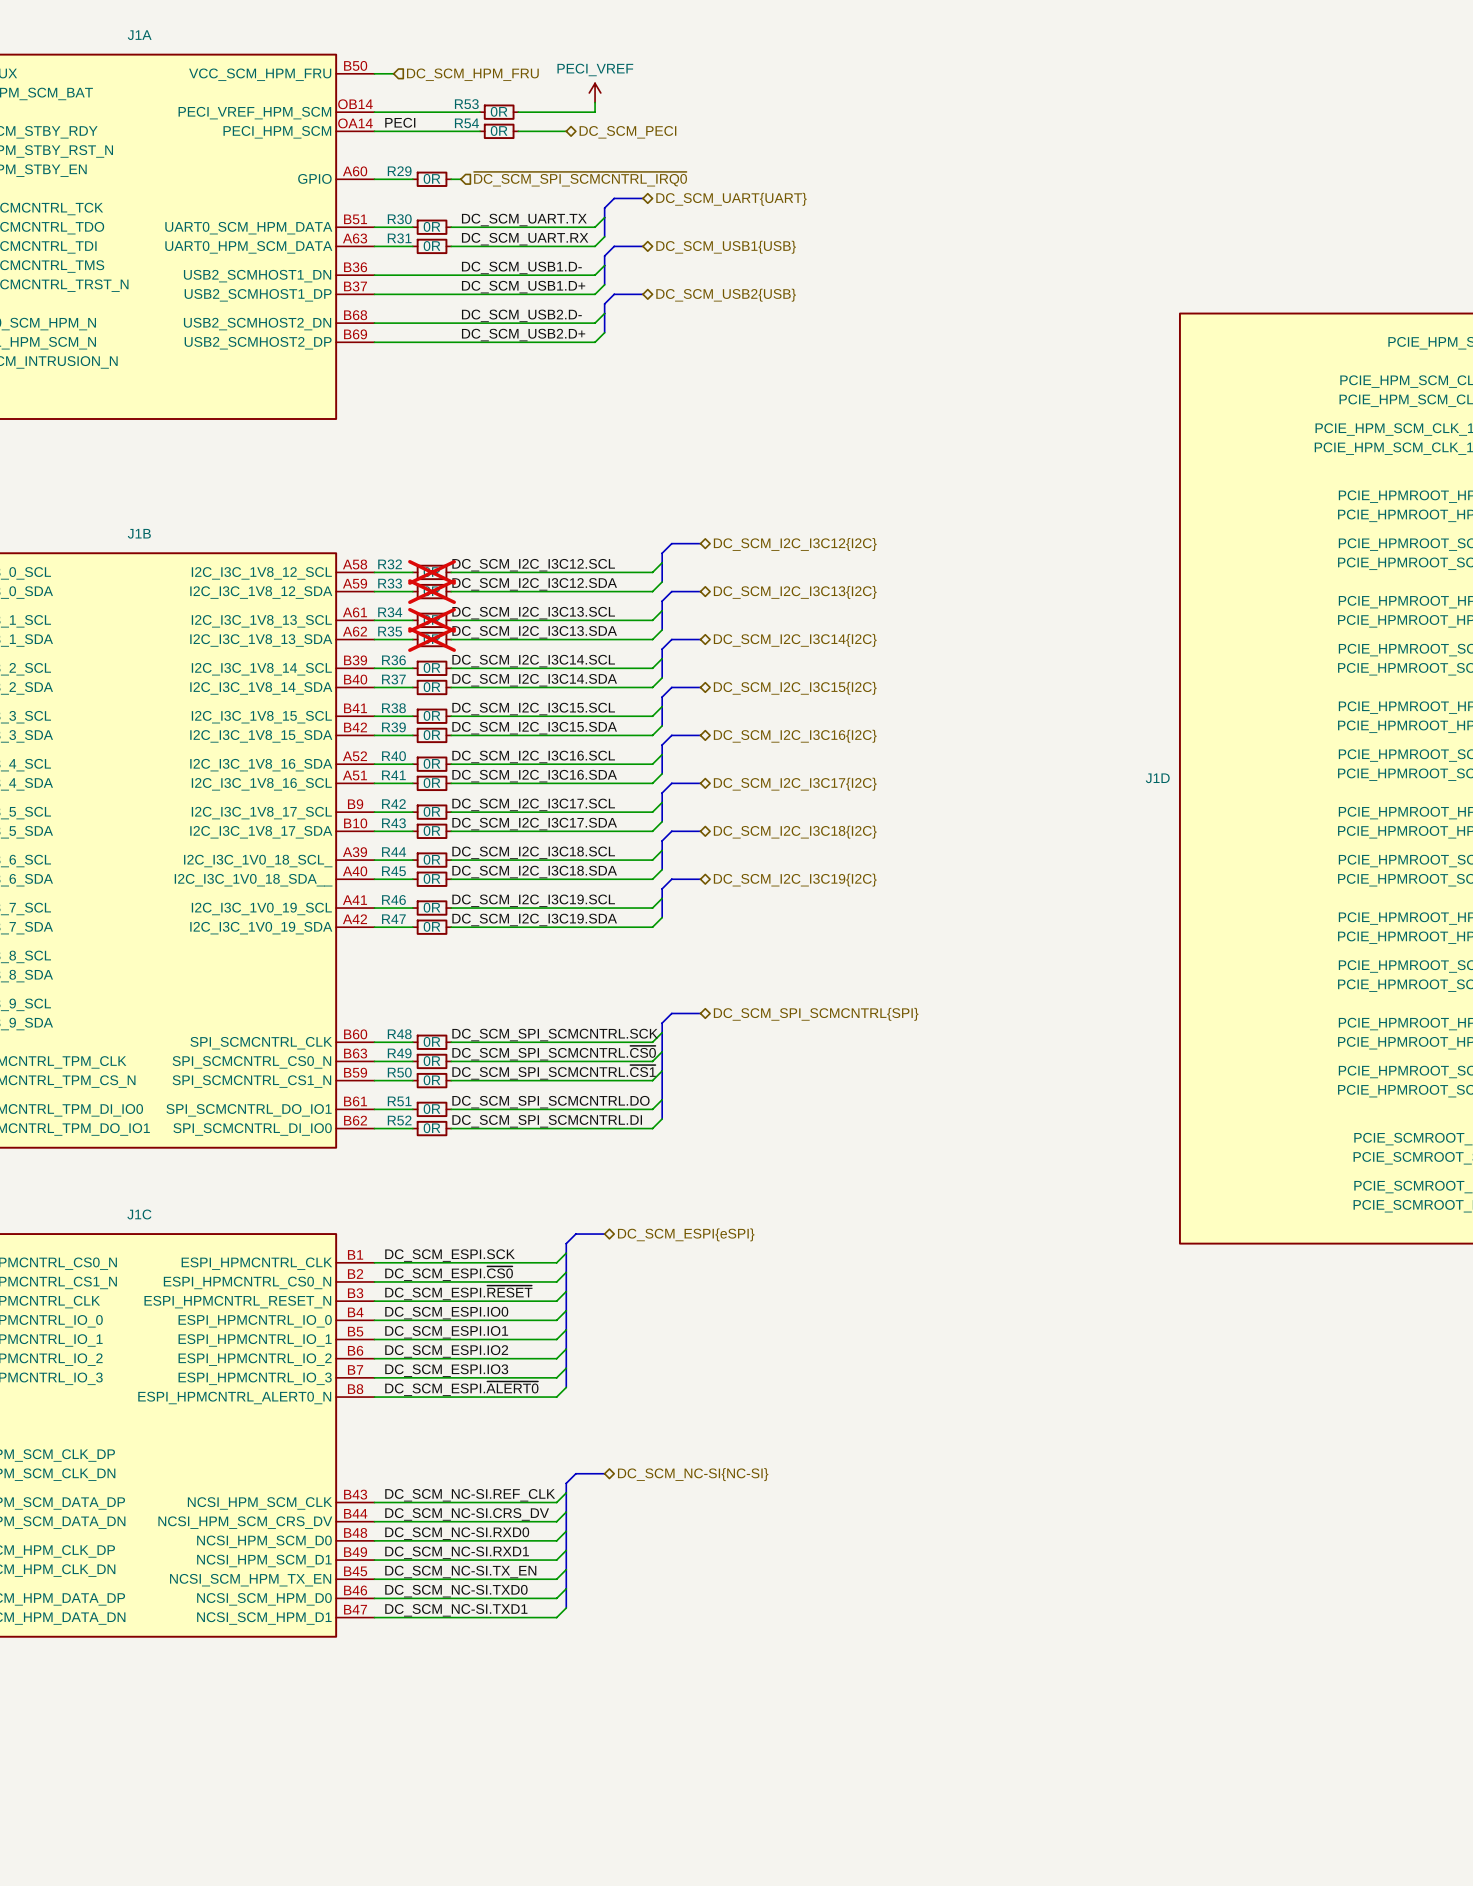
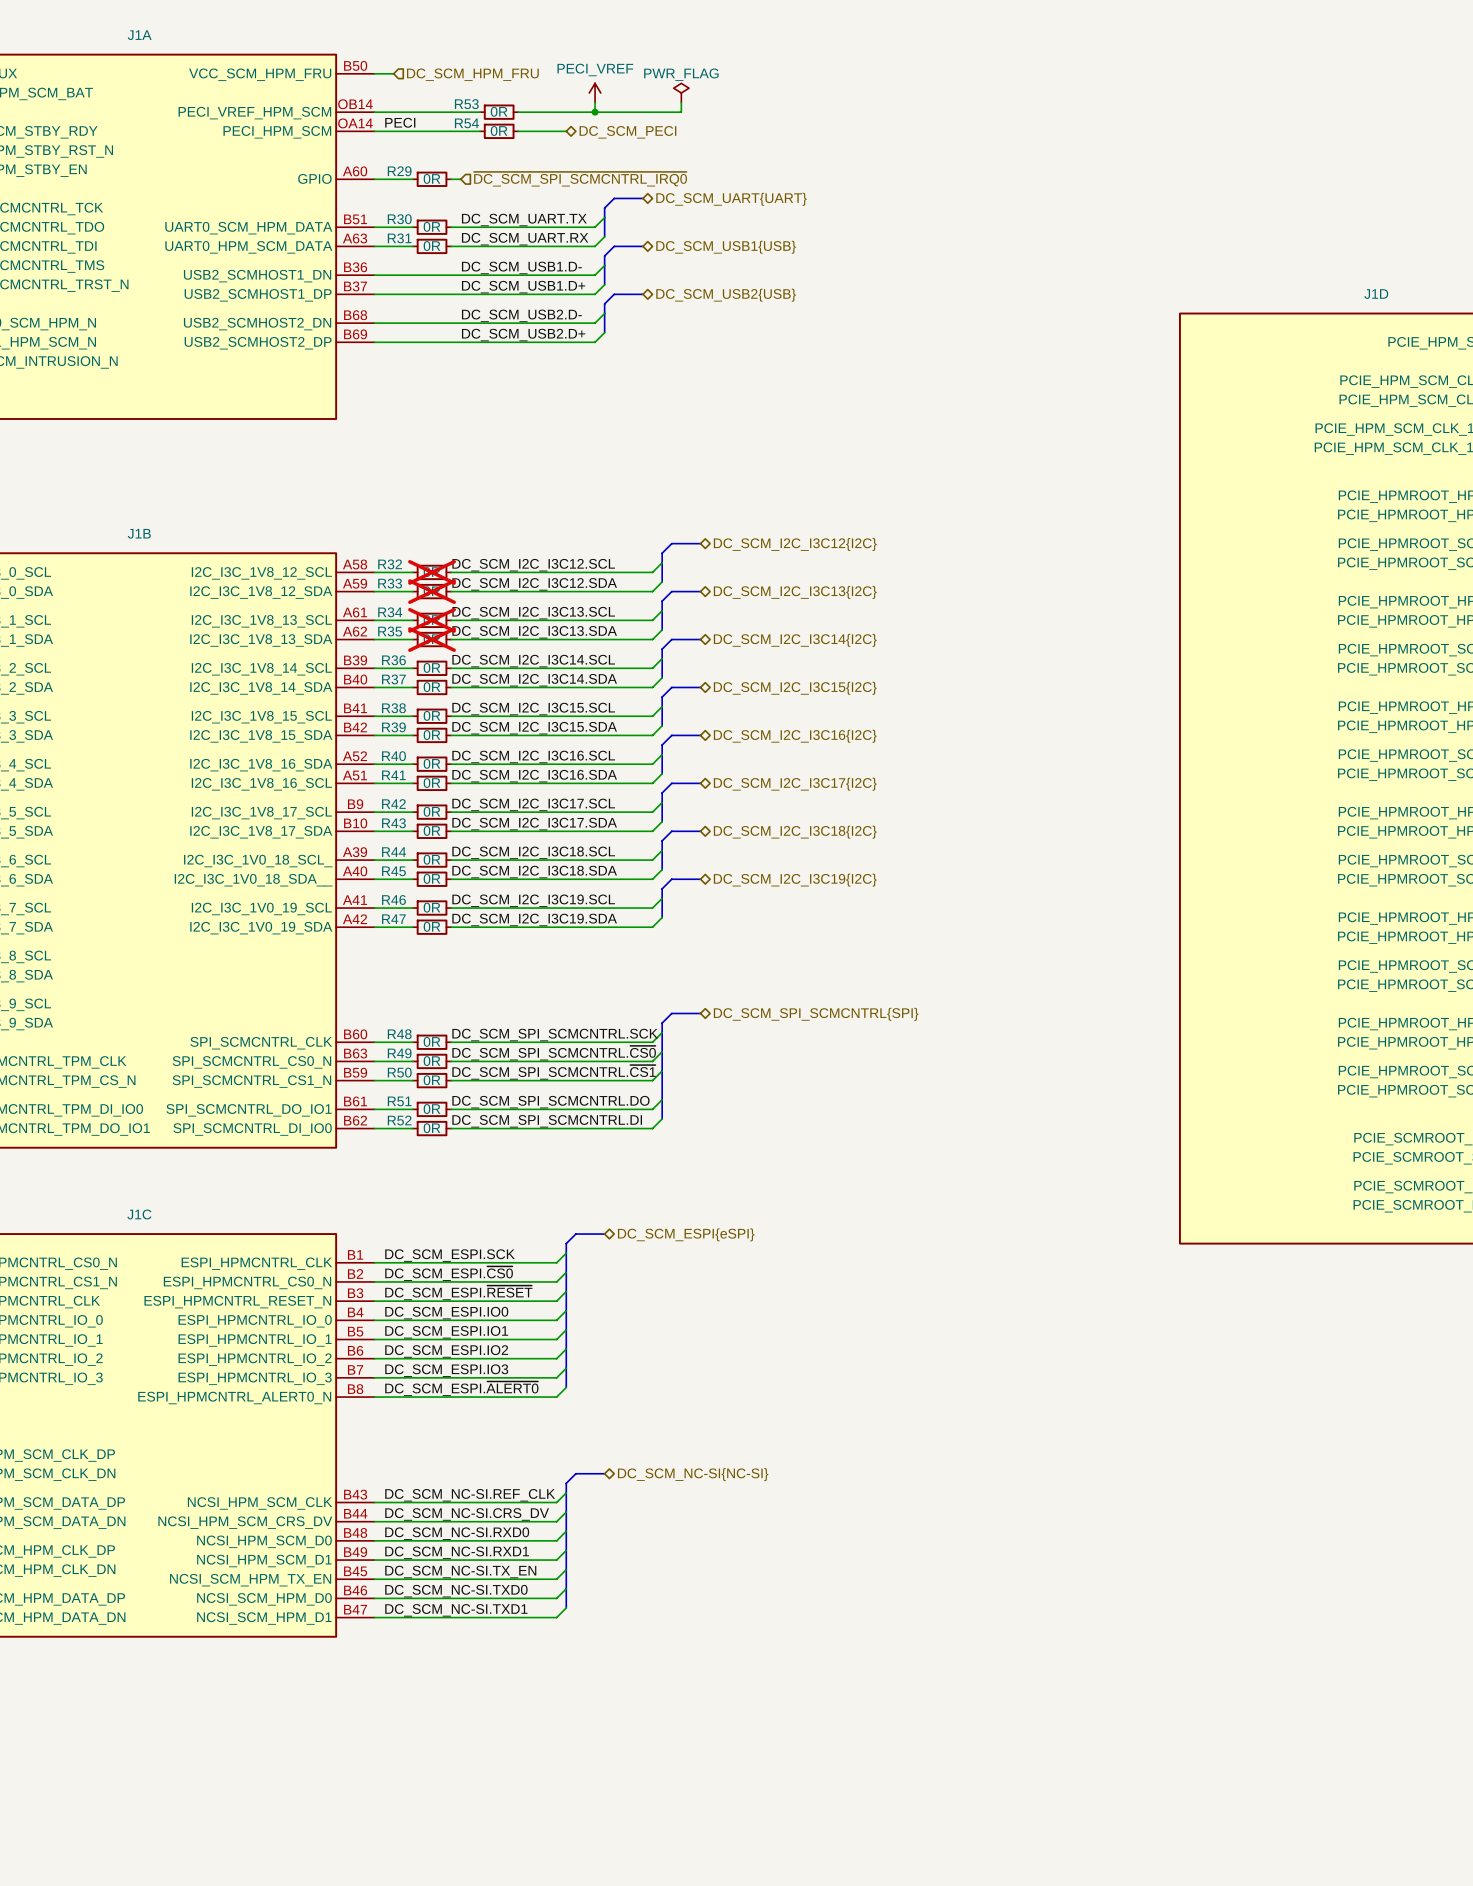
power symbol: none -> PWR_FLAG (681, 92)
wire: none -> (681, 102) (681, 112) (595, 112)
junction: none -> (595, 112)
J1D name position: J1D (1157, 778) -> J1D (1376, 294)

